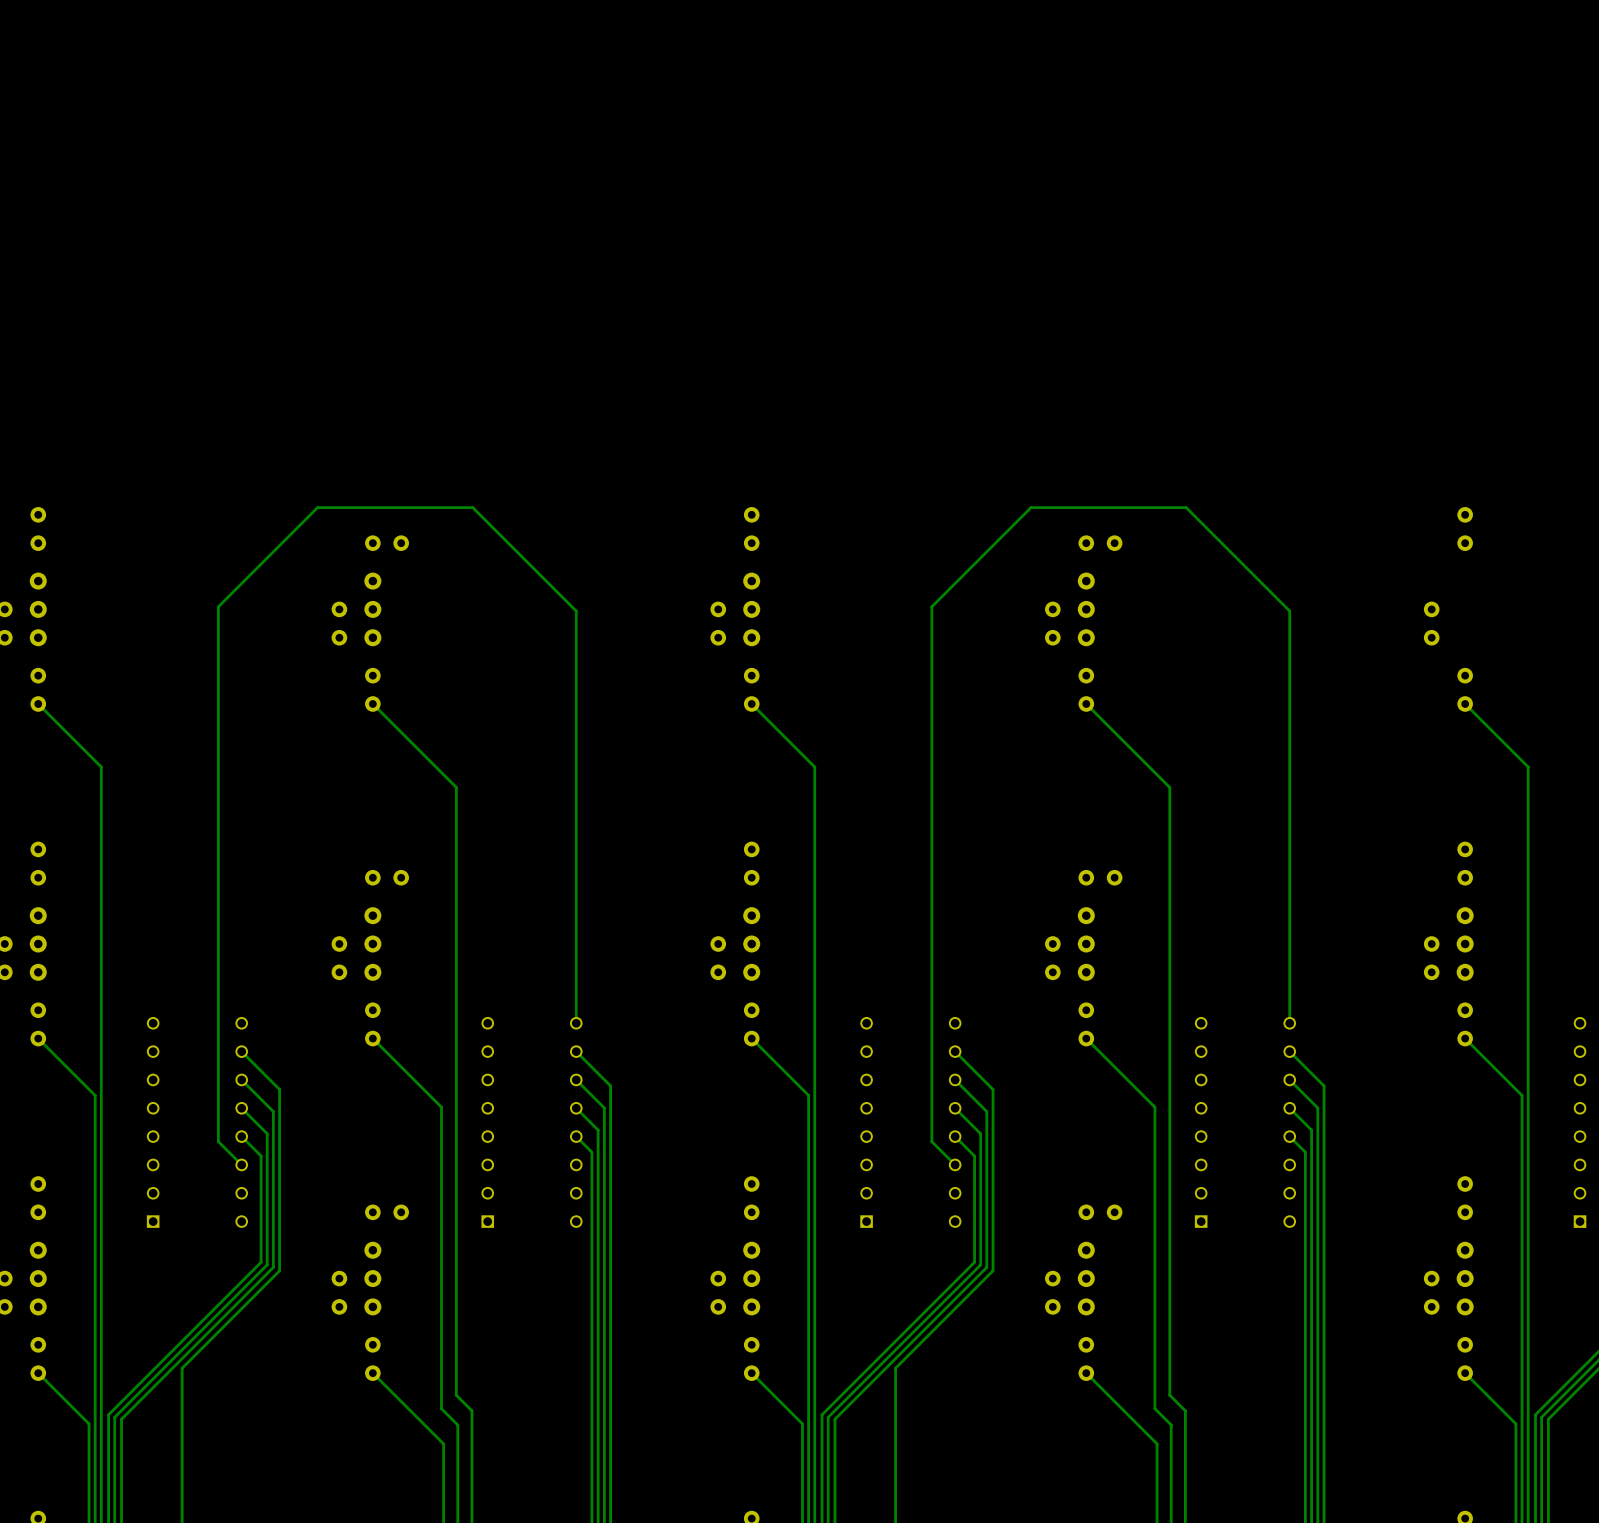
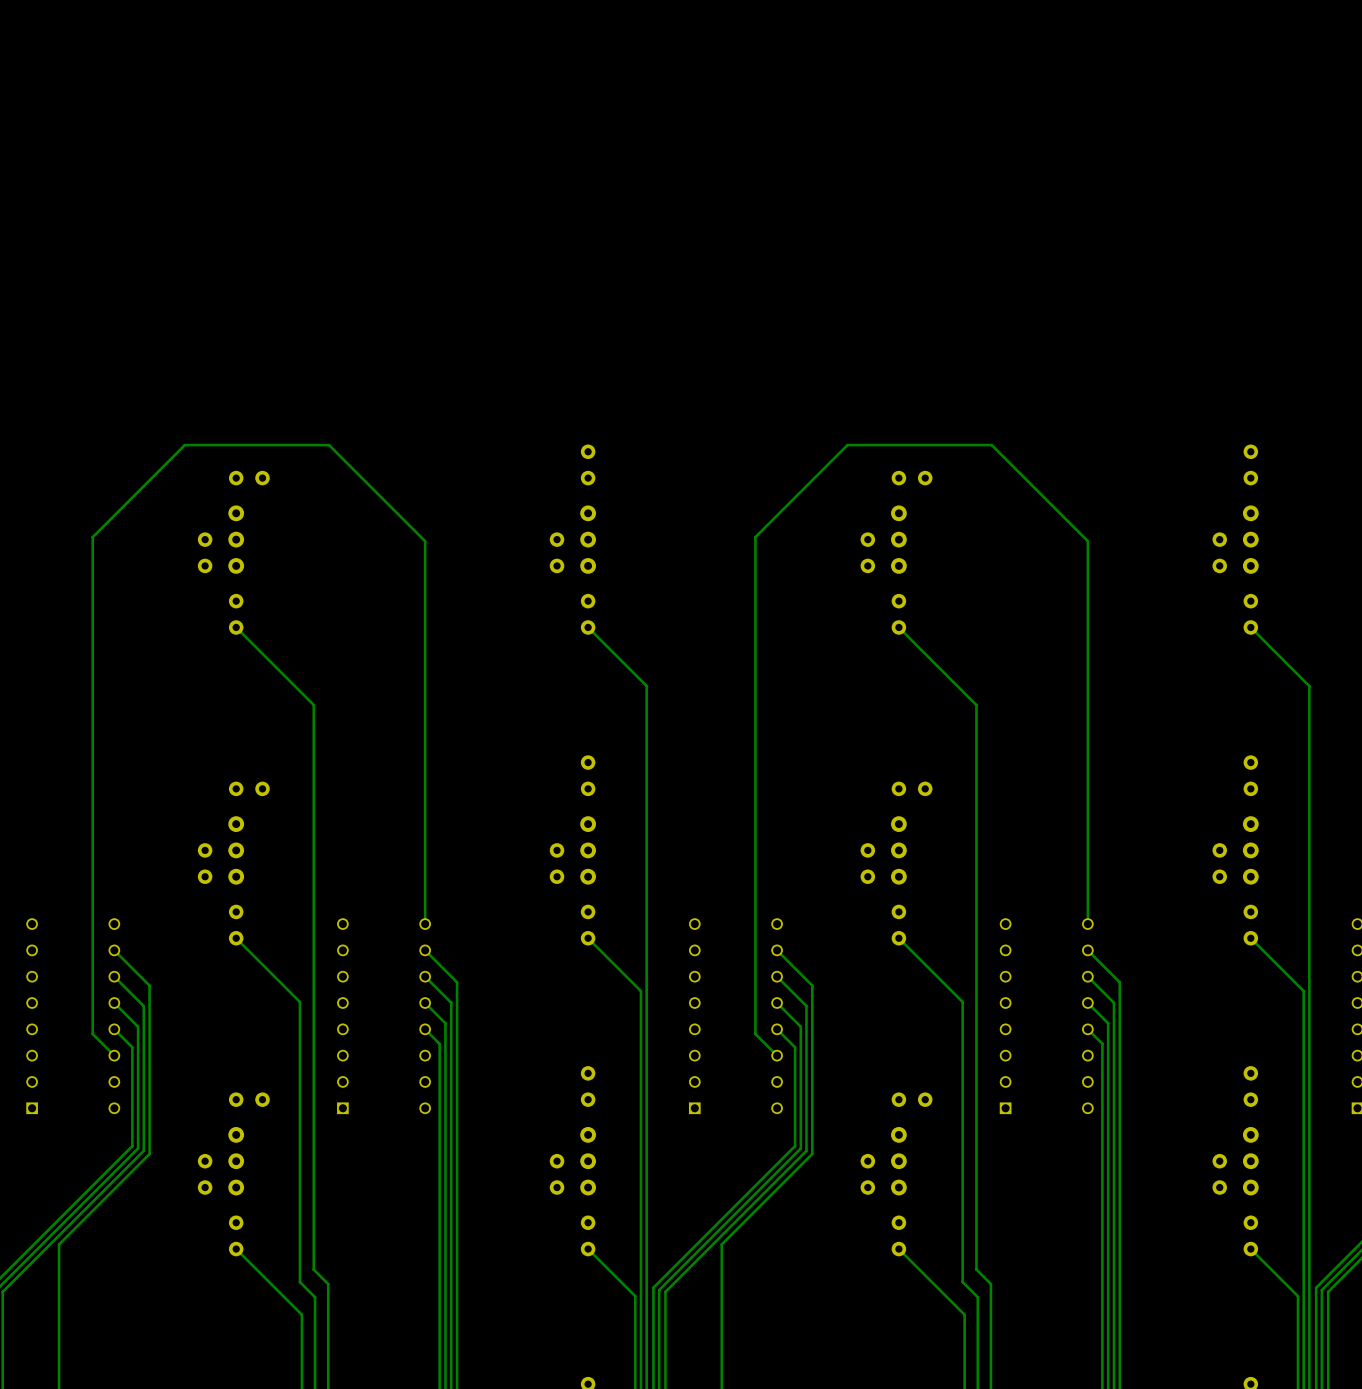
part: none -> (1250, 539)

